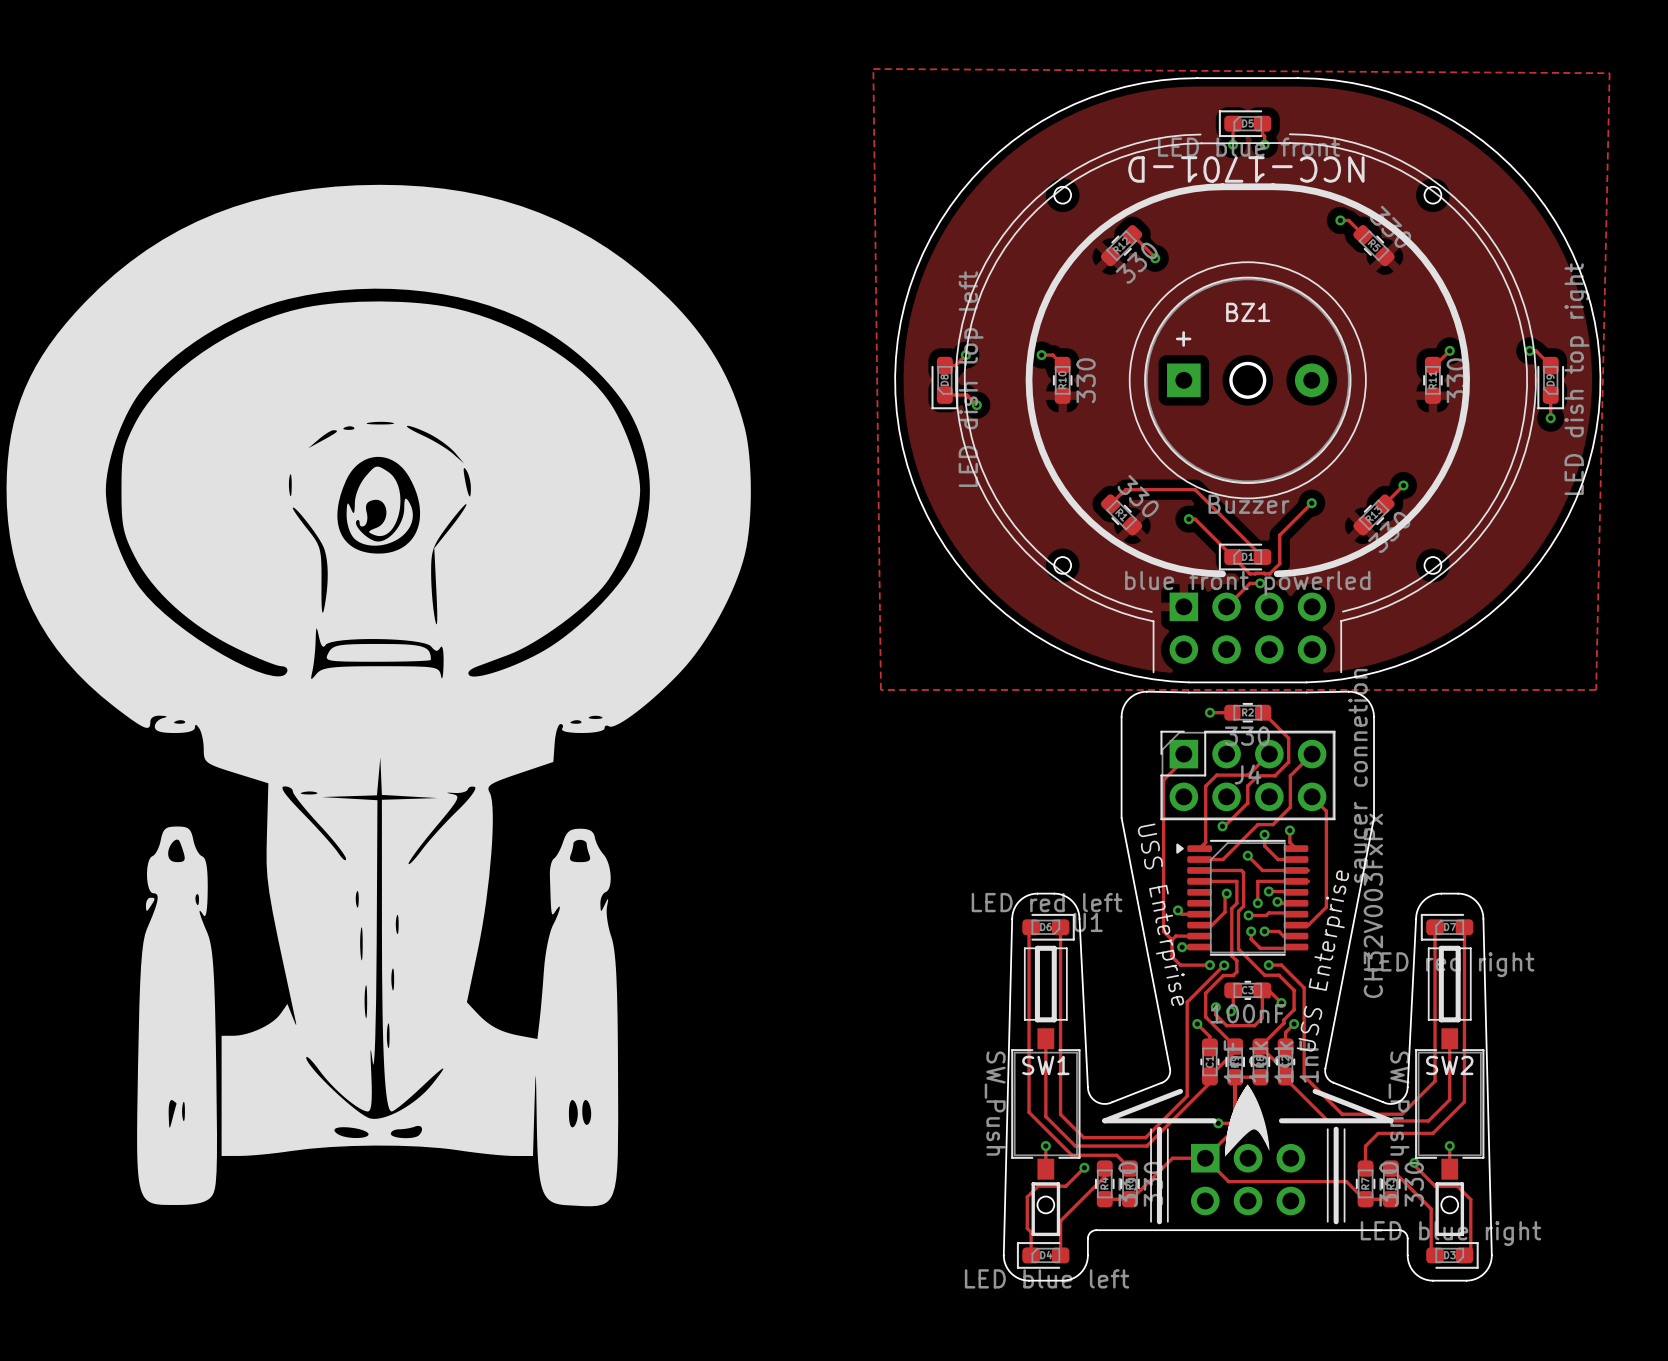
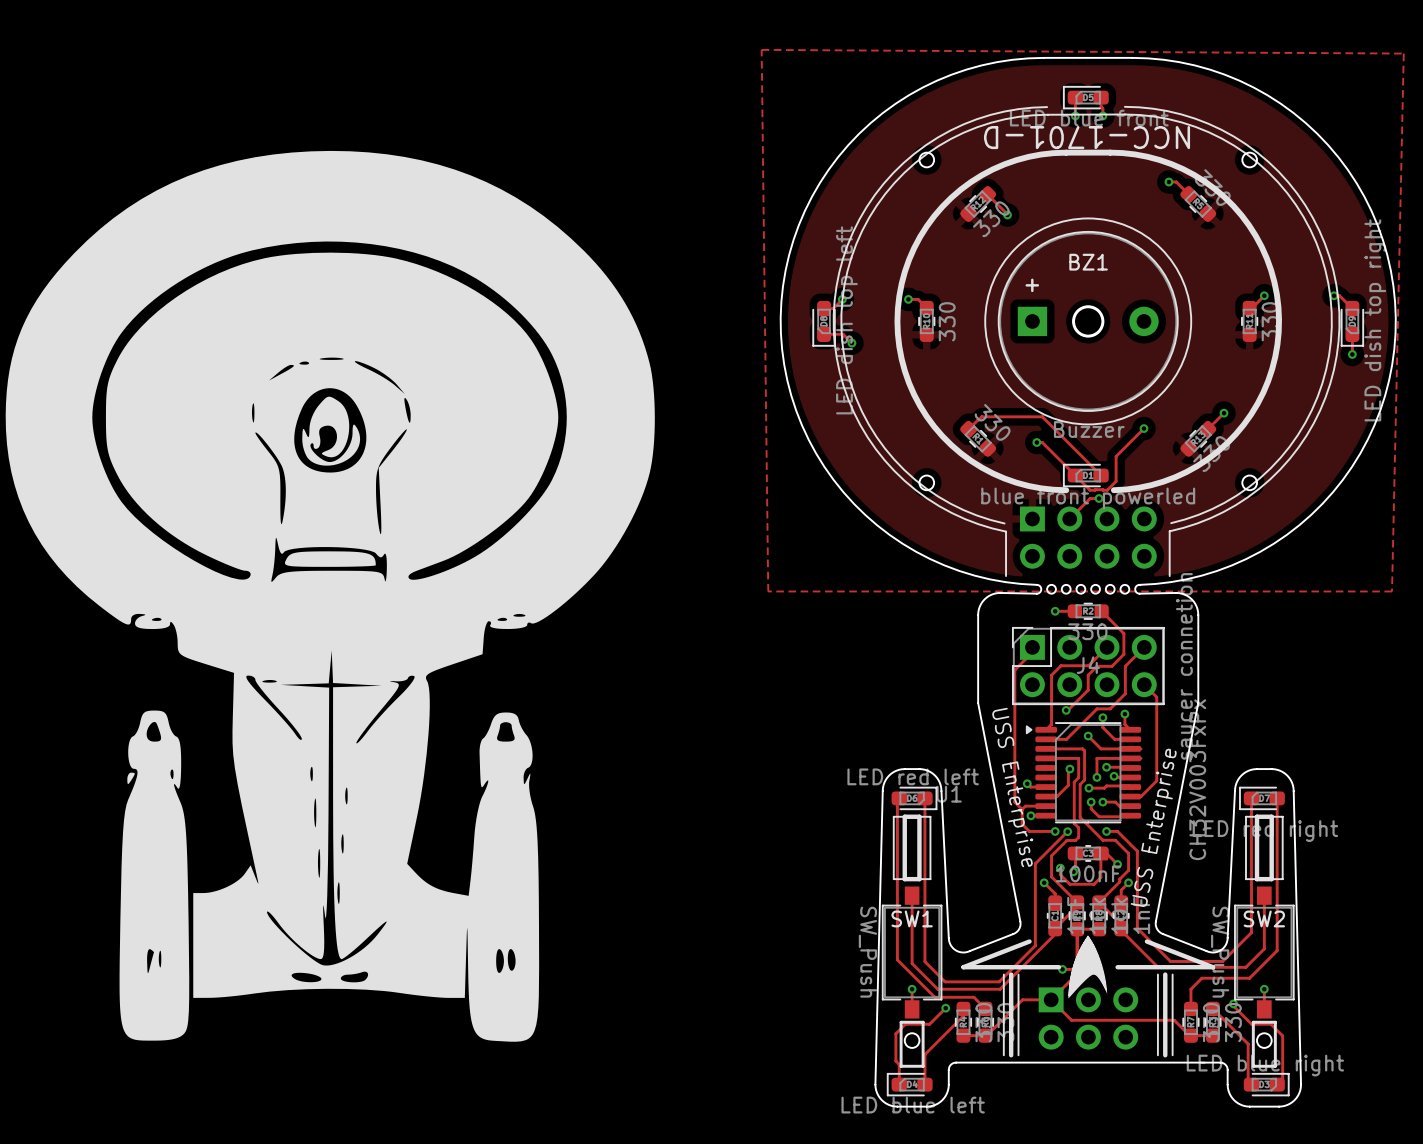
round board edge: none -> [1046, 584, 1057, 595]
round board edge: none -> [1061, 584, 1071, 595]
round board edge: none -> [1076, 584, 1086, 595]
round board edge: none -> [1090, 584, 1101, 595]
round board edge: none -> [1105, 584, 1116, 595]
round board edge: none -> [1120, 584, 1130, 595]
board edge: (1188, 682) (1306, 682) -> (1036, 584) (1041, 589) (1036, 593)
board edge: (1188, 692) (1306, 692) -> (1139, 584) (1135, 589) (1139, 593)

